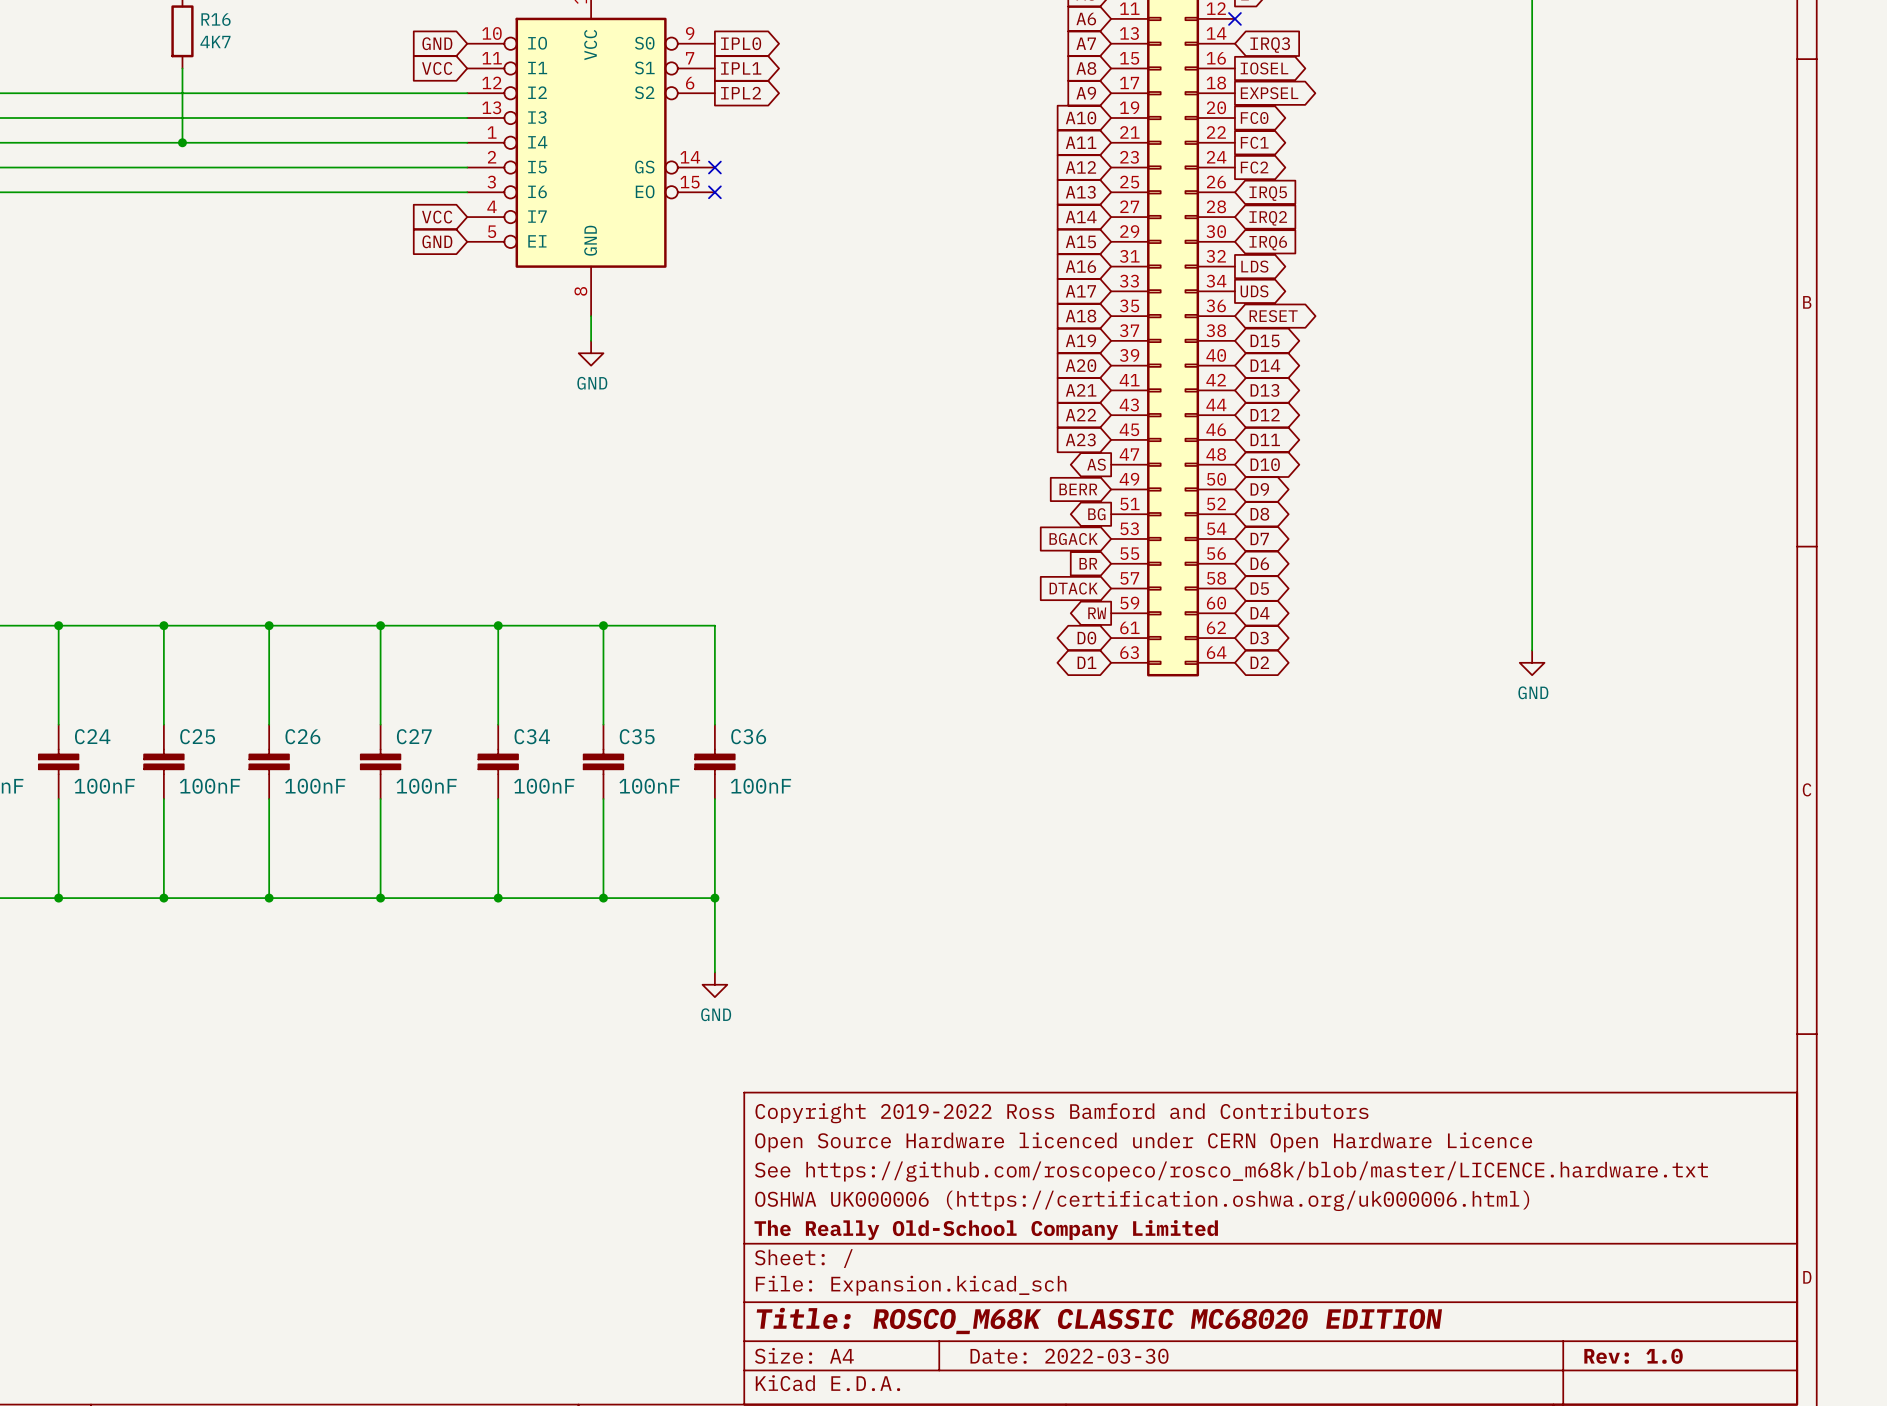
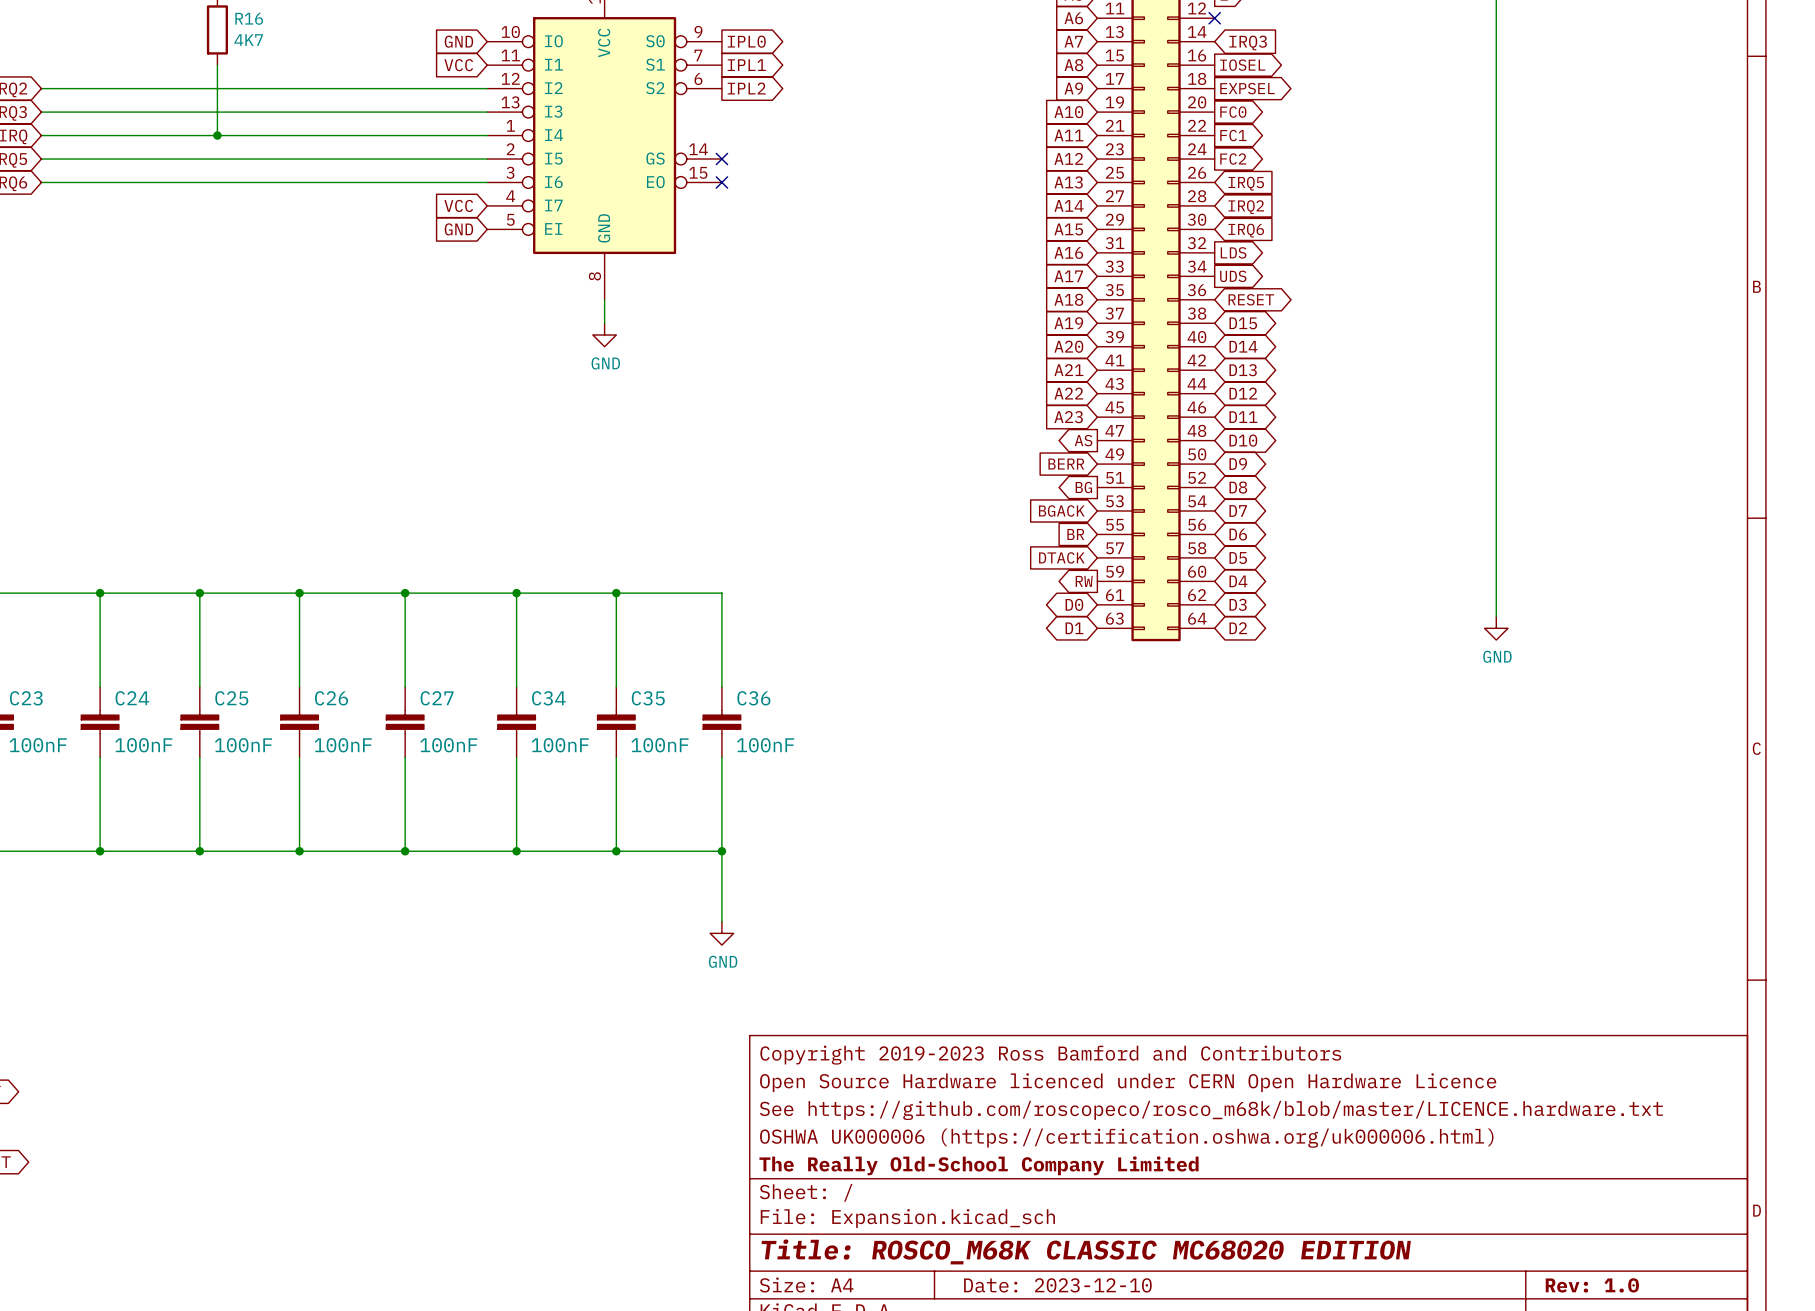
title block: Copyright 2019-2022 Ross Bamford and Contributors (1061, 1113) -> Copyright 2019-2023 Ross Bamford and Contributors (1050, 1055)
title block: Date: 2022-03-30 (1069, 1356) -> Date: 2023-12-10 (1057, 1285)

